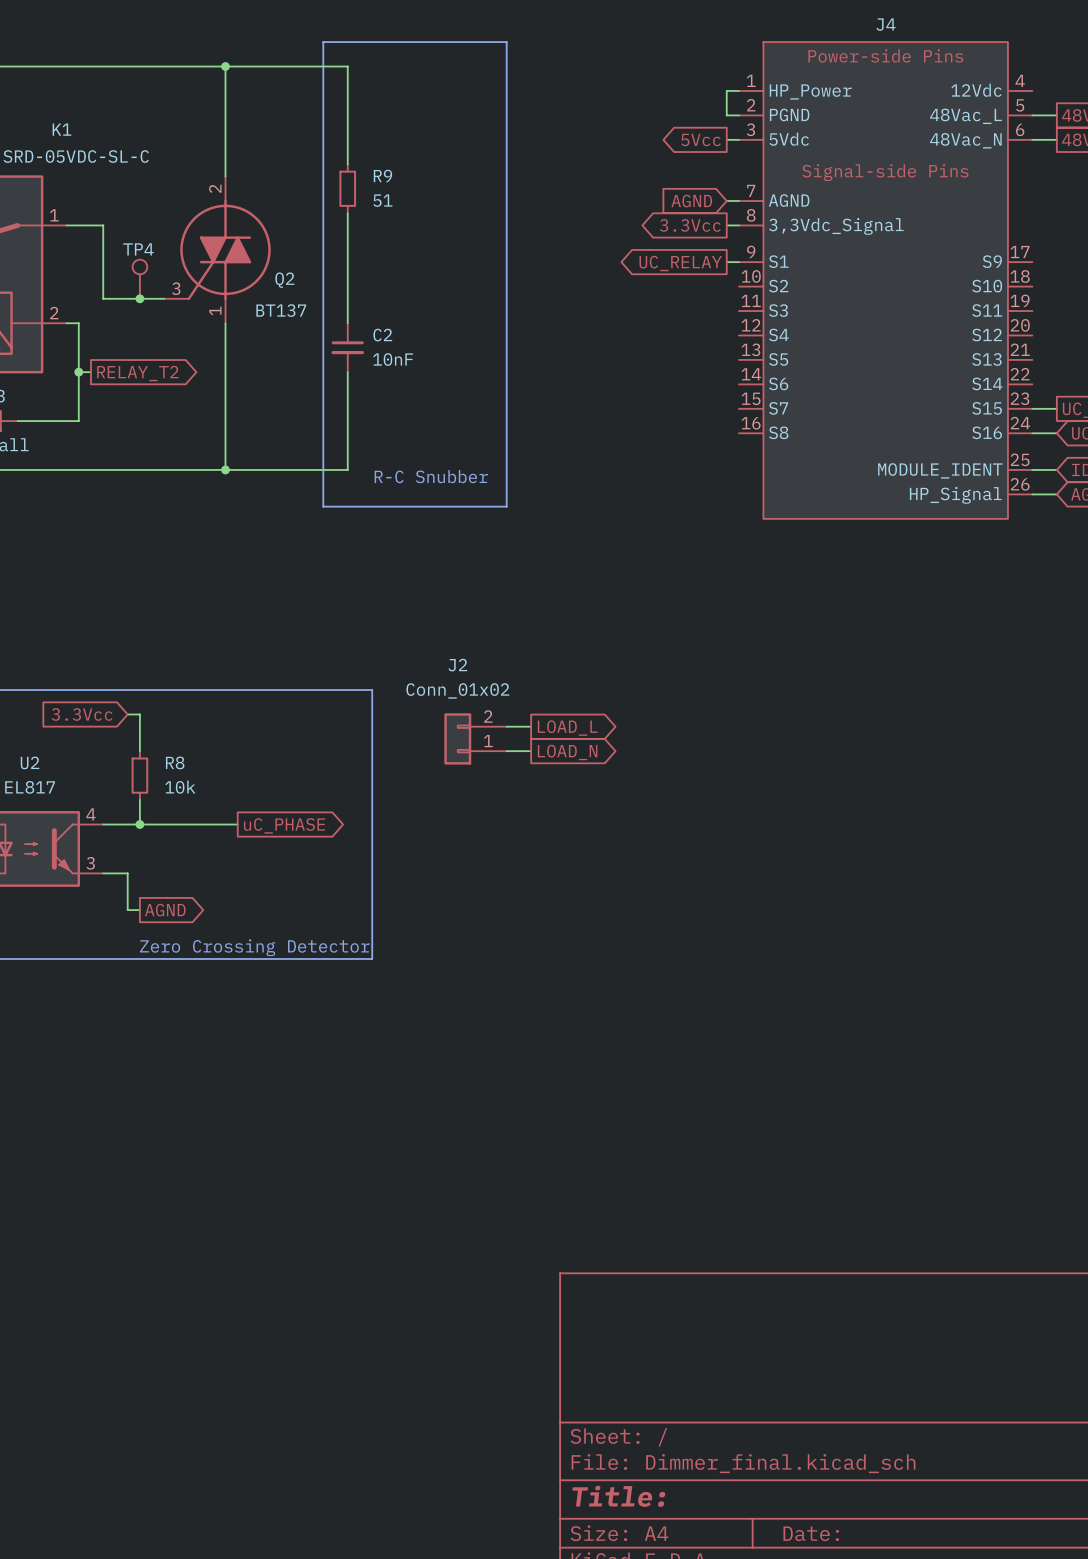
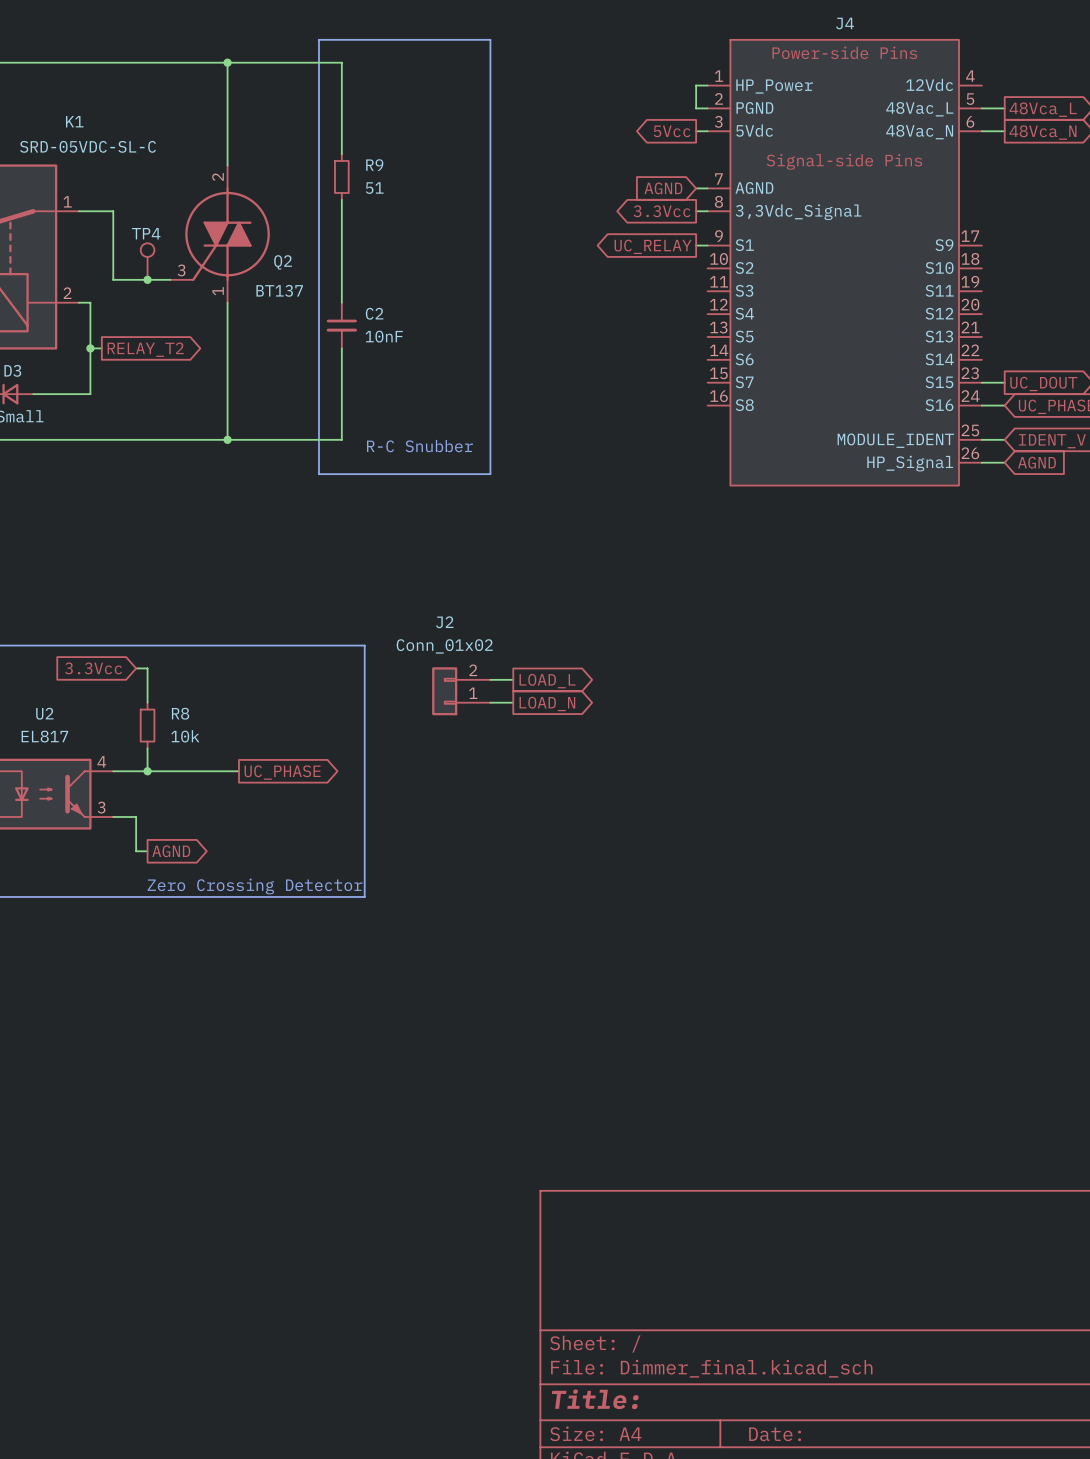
global label: uC_PHASE (284, 825) -> UC_PHASE (282, 772)

